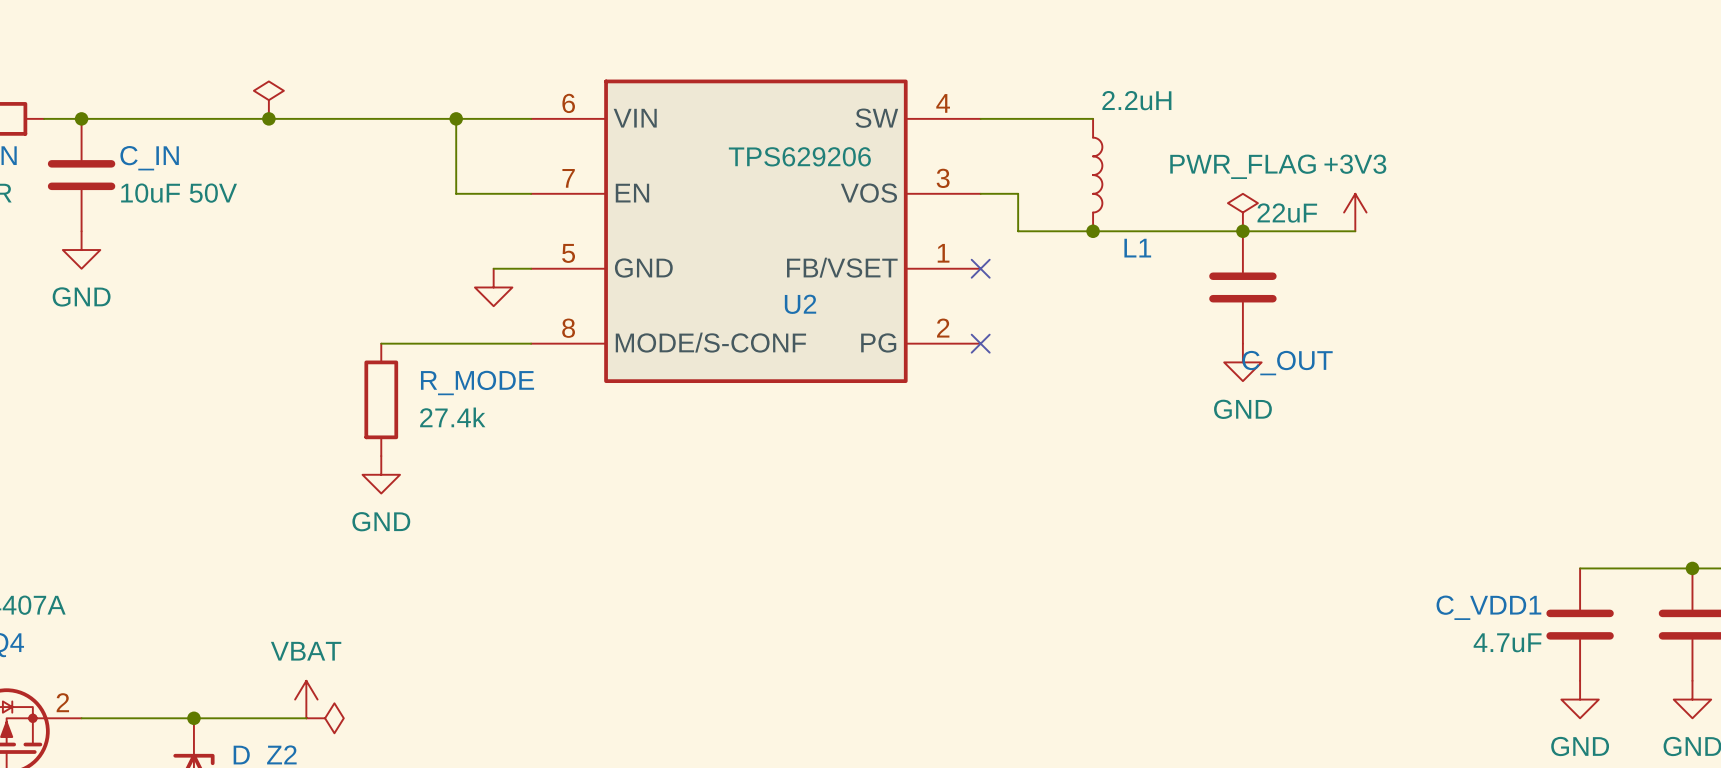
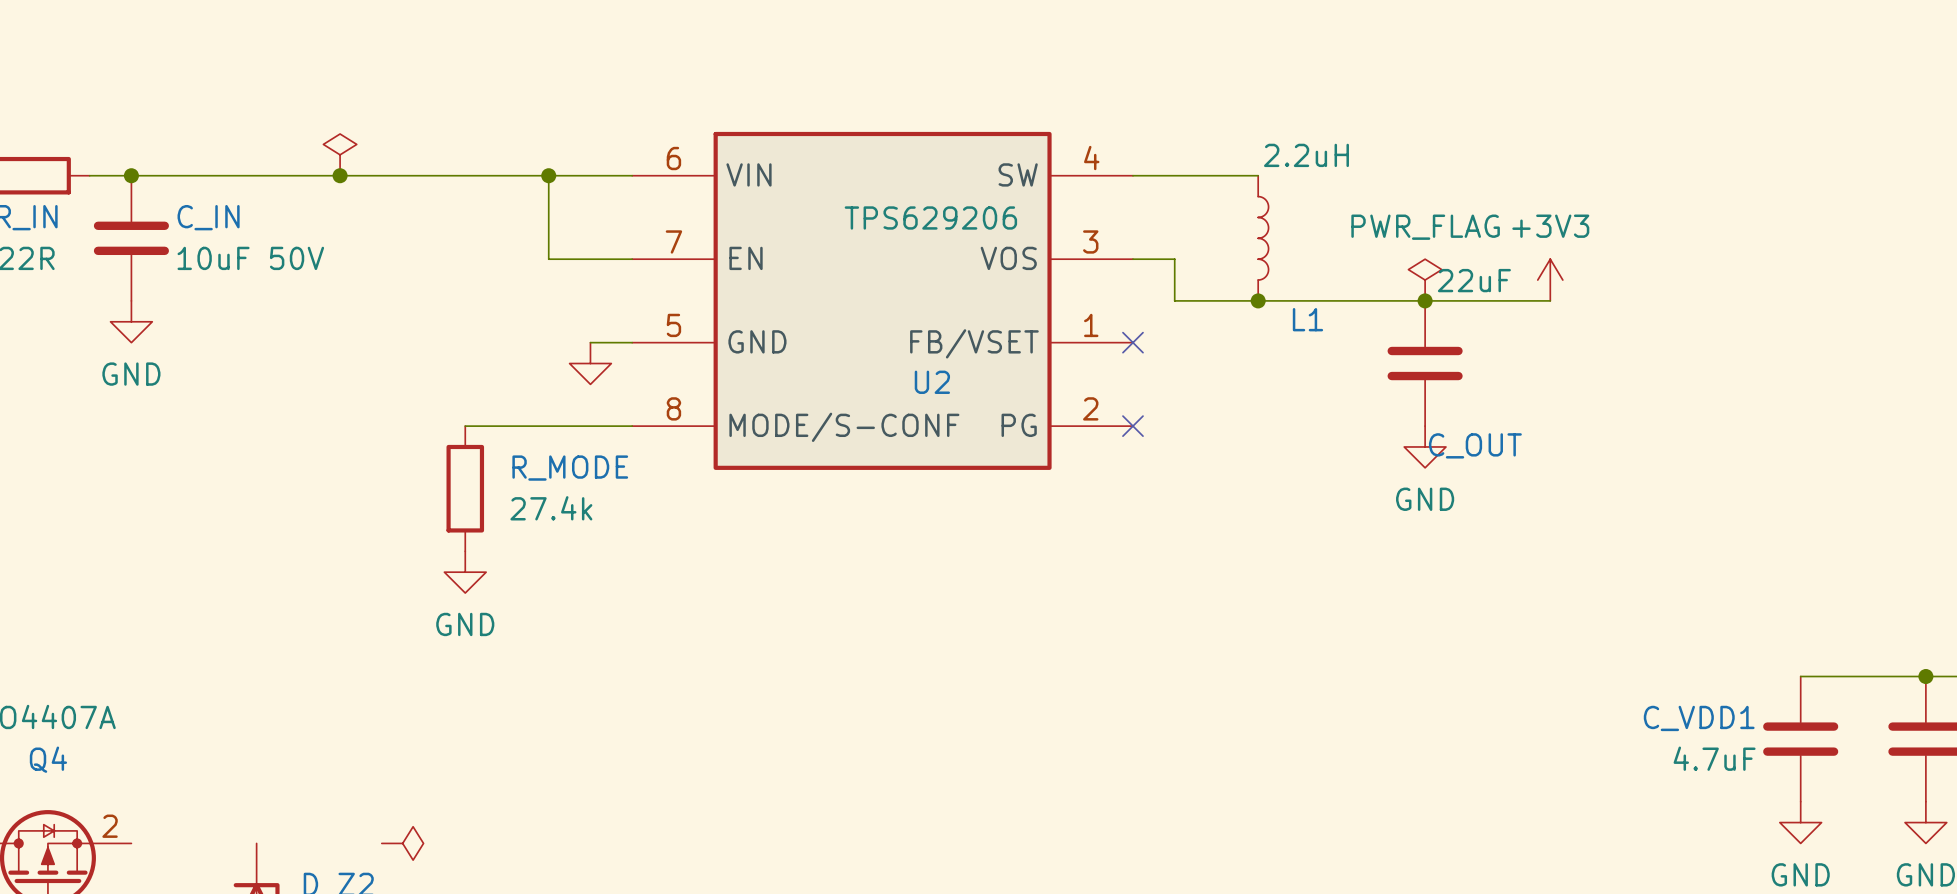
power symbol: VBAT (306, 699) -> none
wire: (81, 718) (306, 718) -> none
junction: (193, 718) -> none

